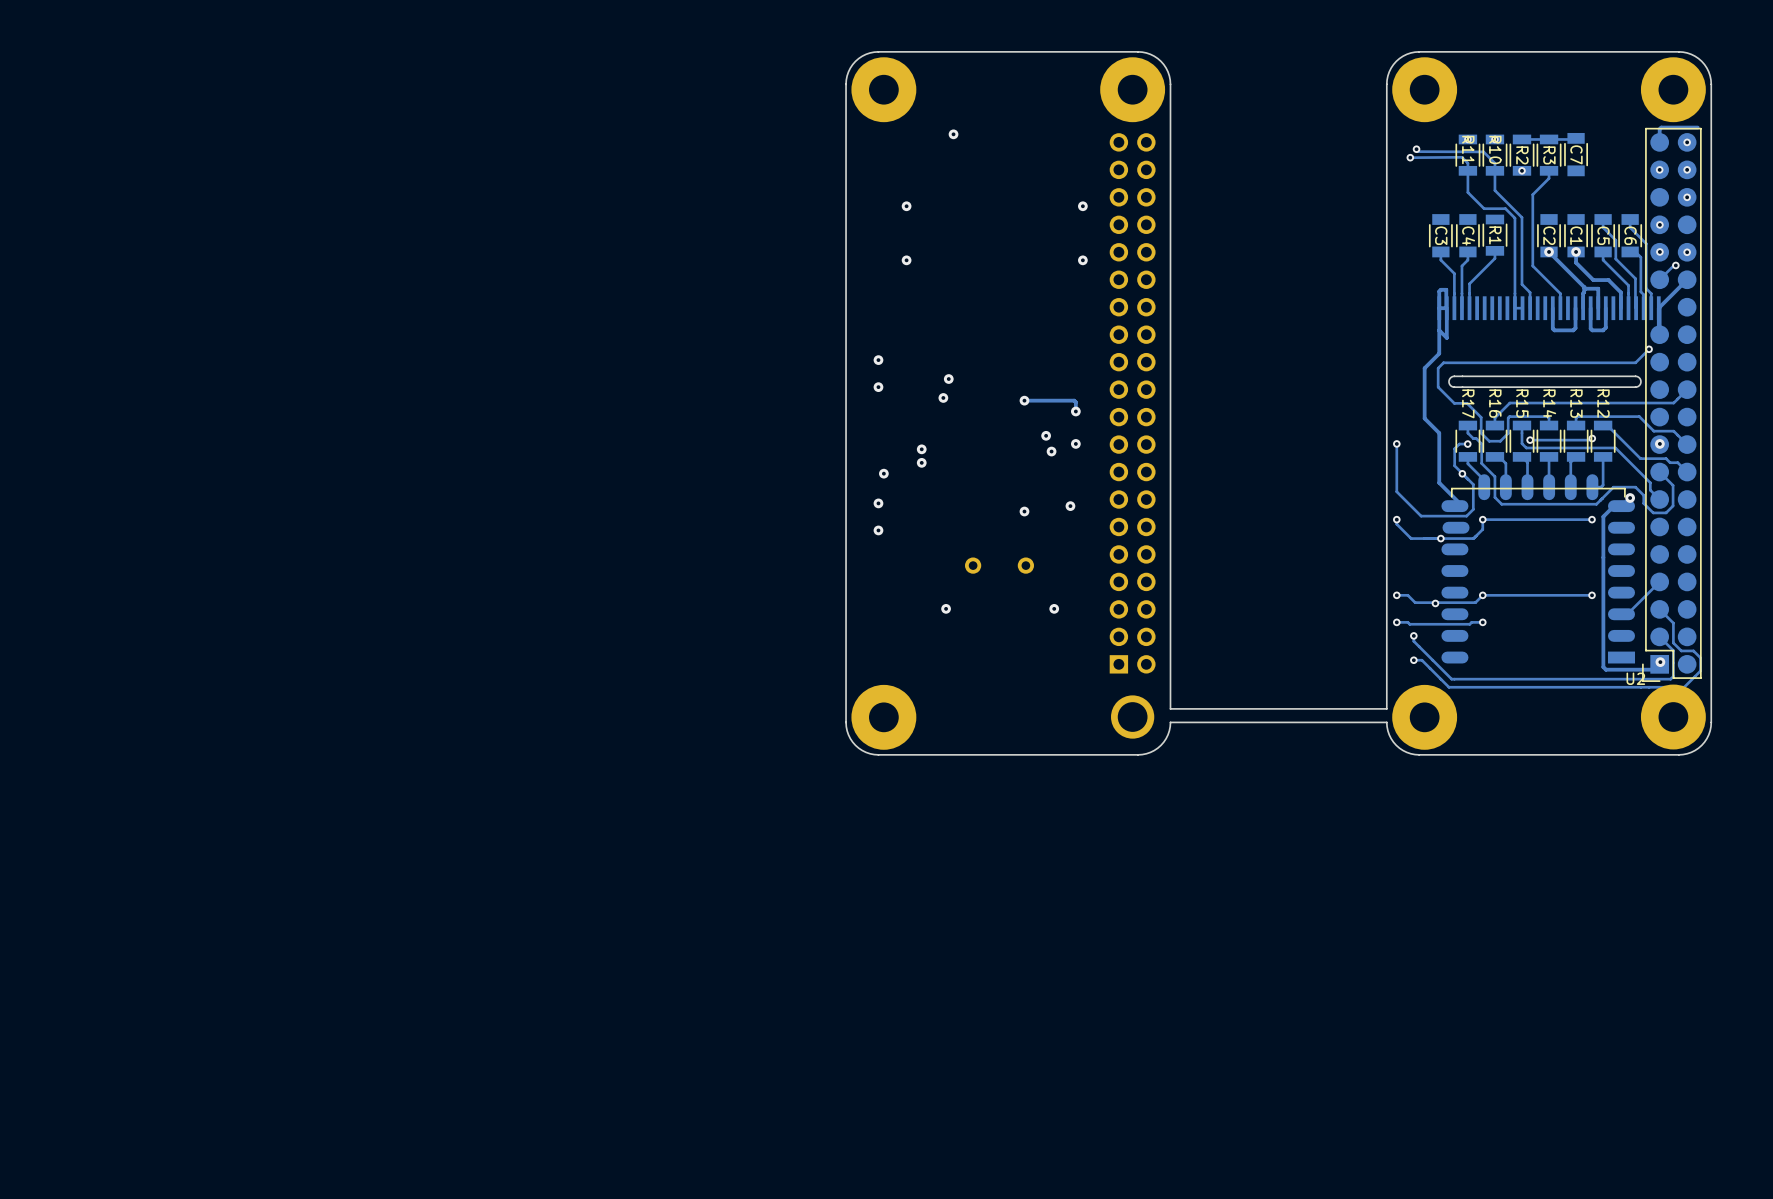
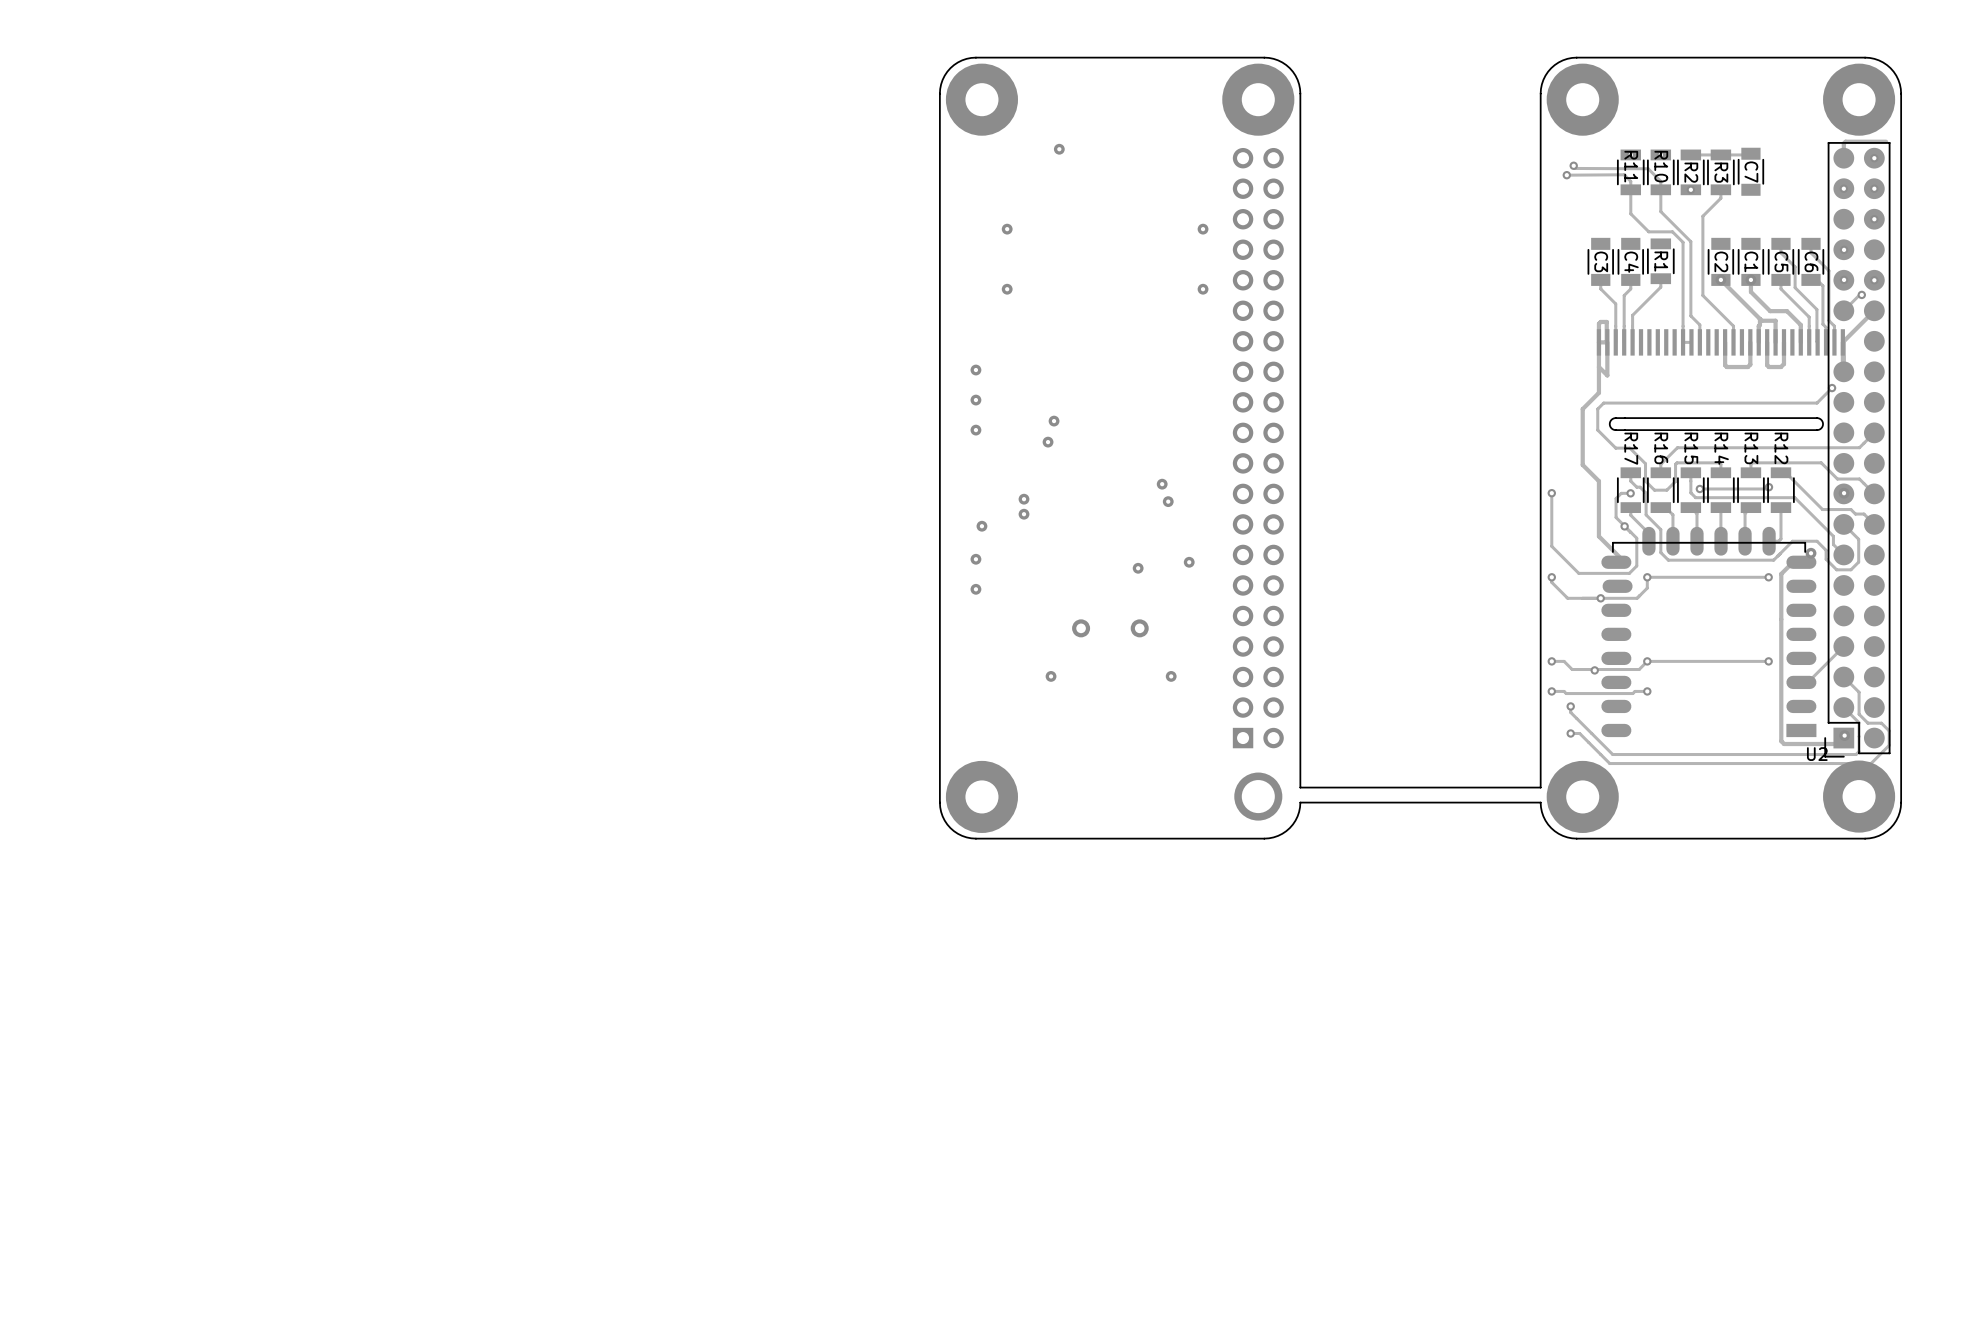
via: none -> (975, 370)
track: (1024, 400) (1074, 400) (1075, 411) -> none
via: (1024, 400) -> none
via: (1075, 411) -> none
via: (1075, 443) -> none

